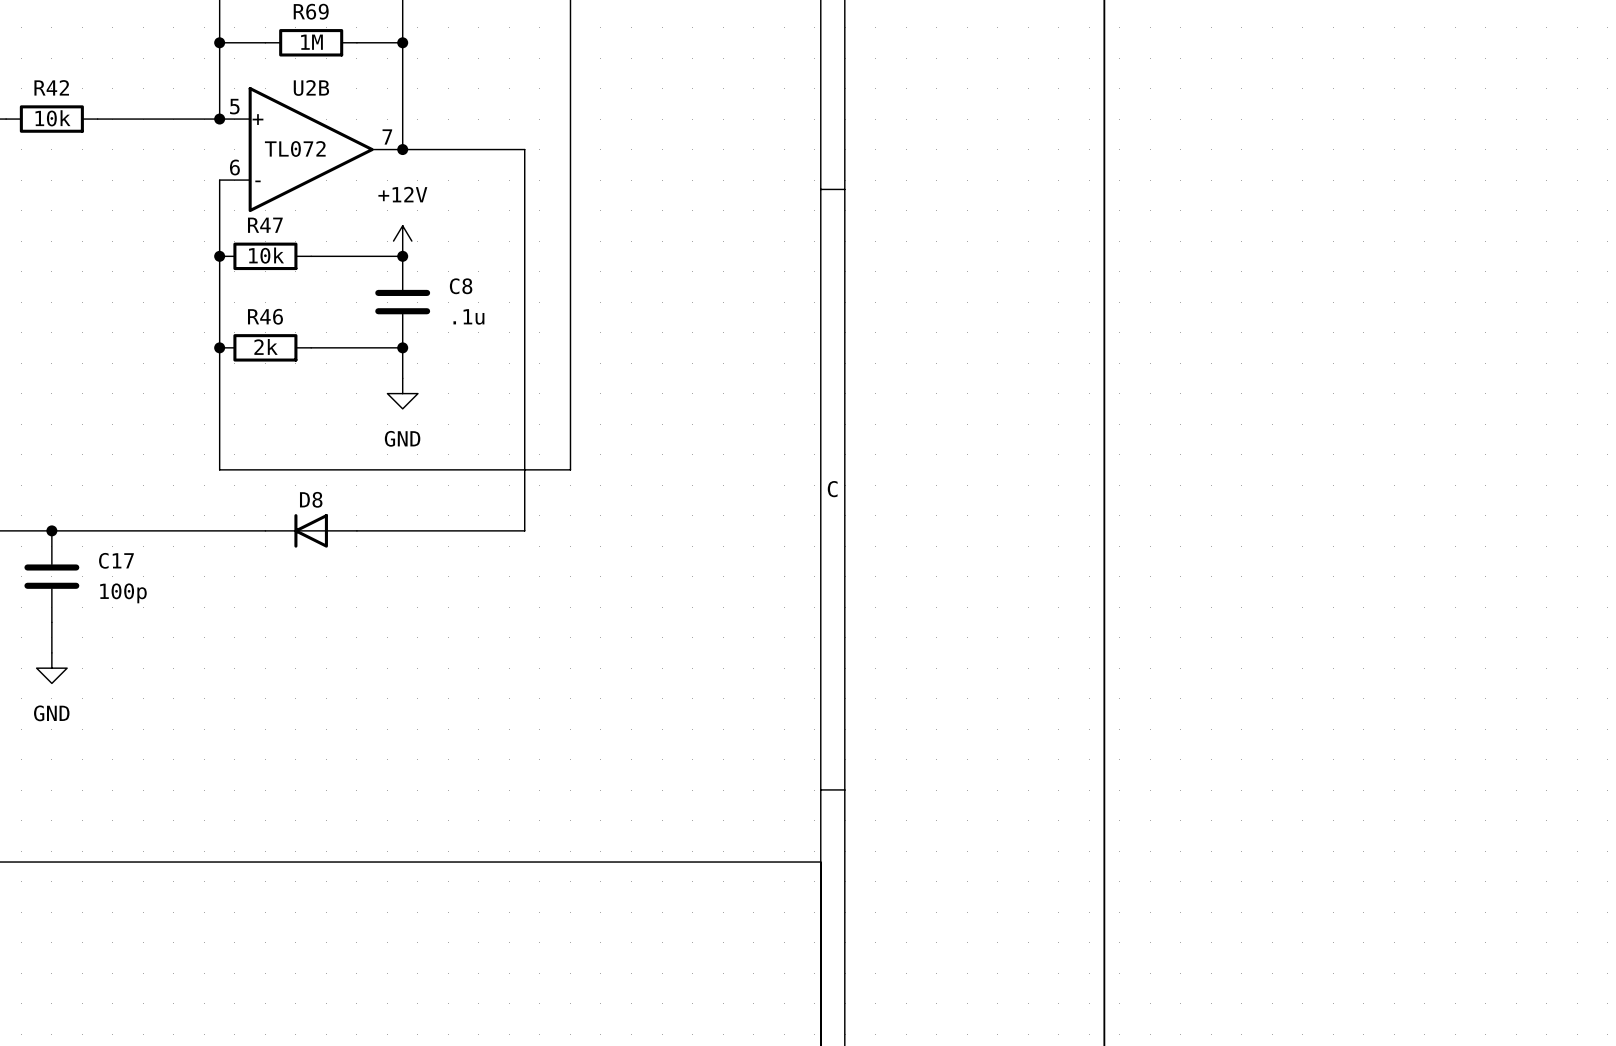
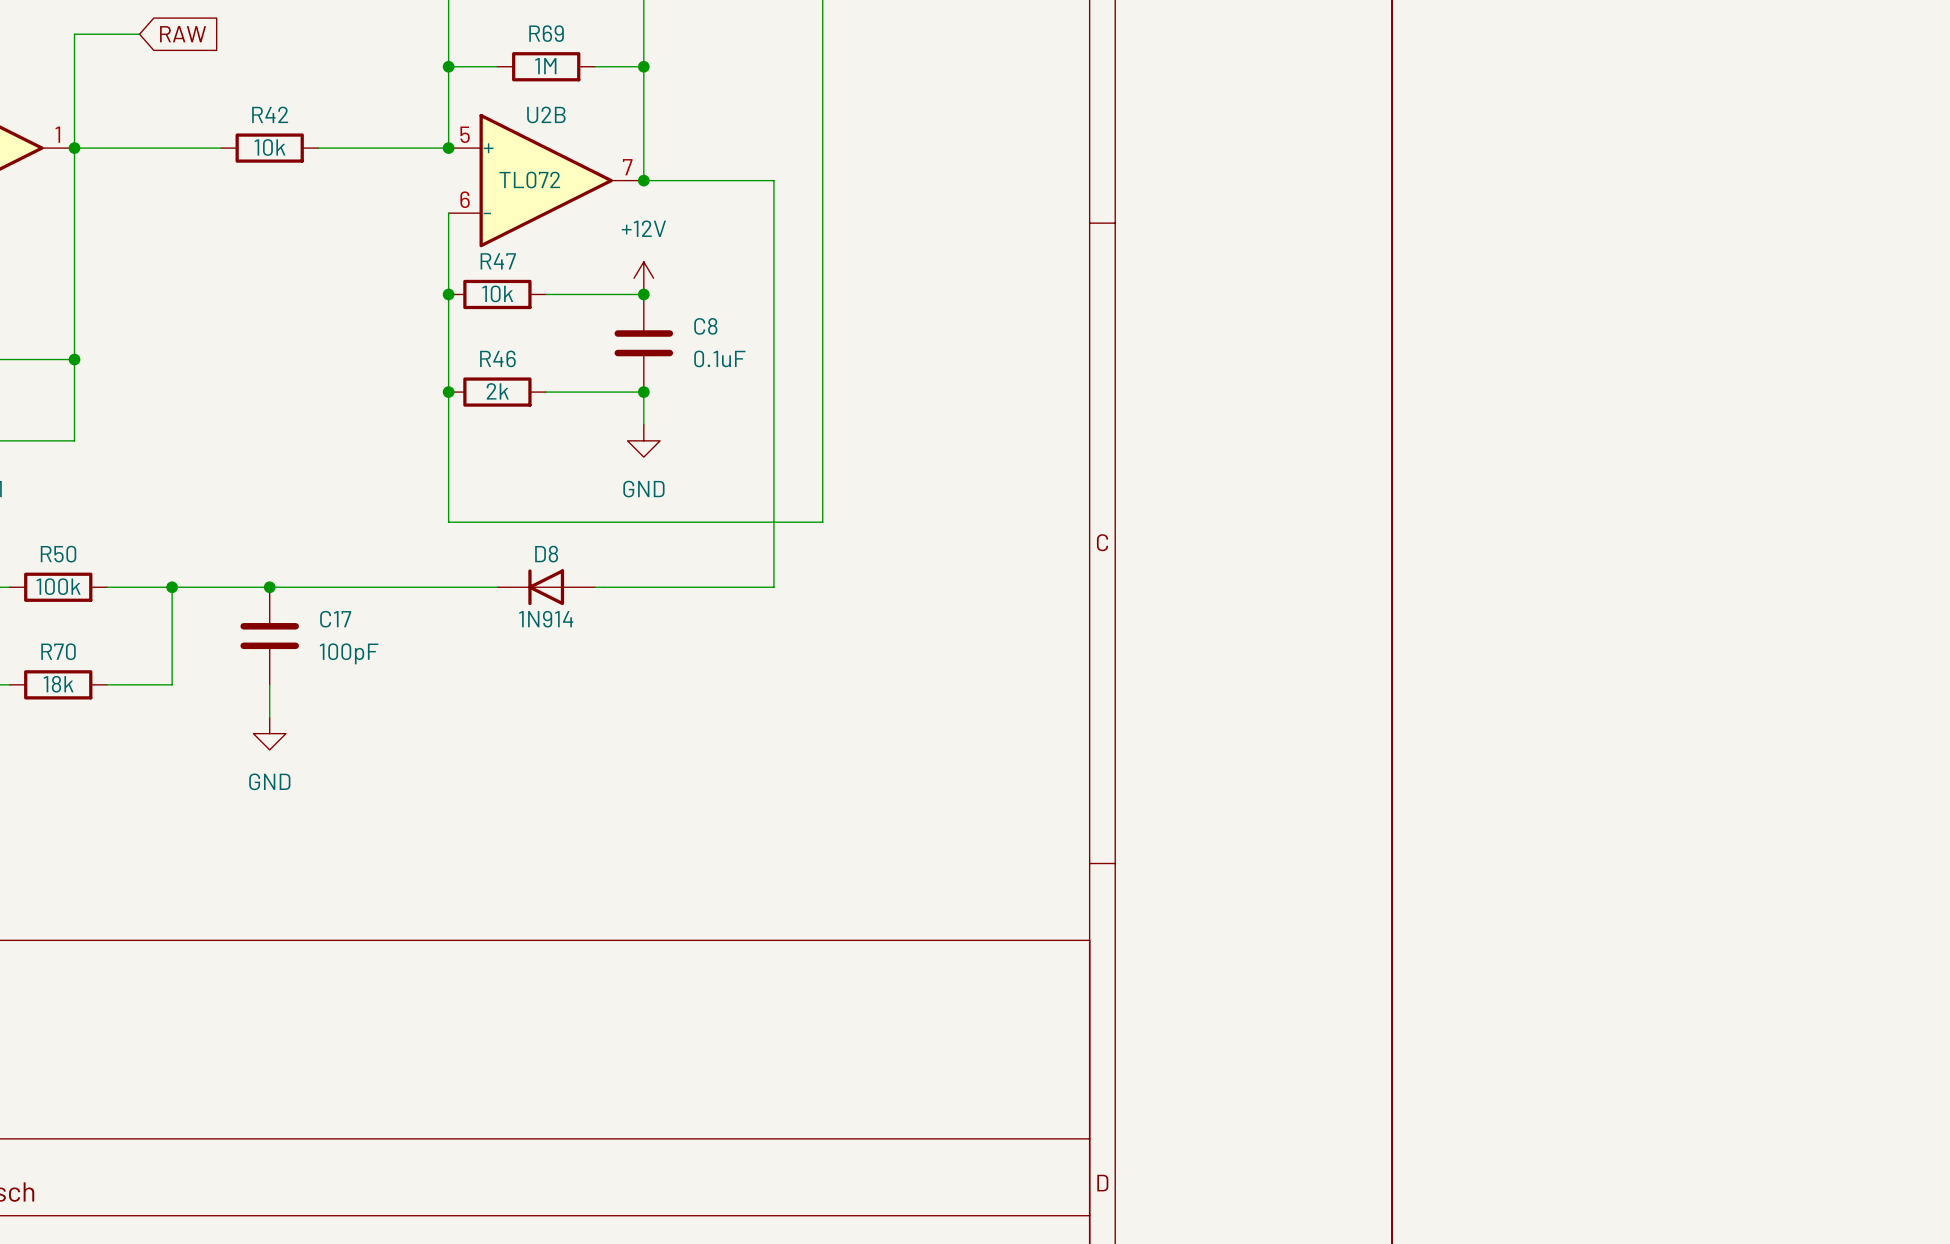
C8 value: .1u (468, 316) -> 0.1uF (719, 358)
D8 value: none -> 1N914 (546, 619)
C17 value: 100p (123, 593) -> 100pF (349, 653)

